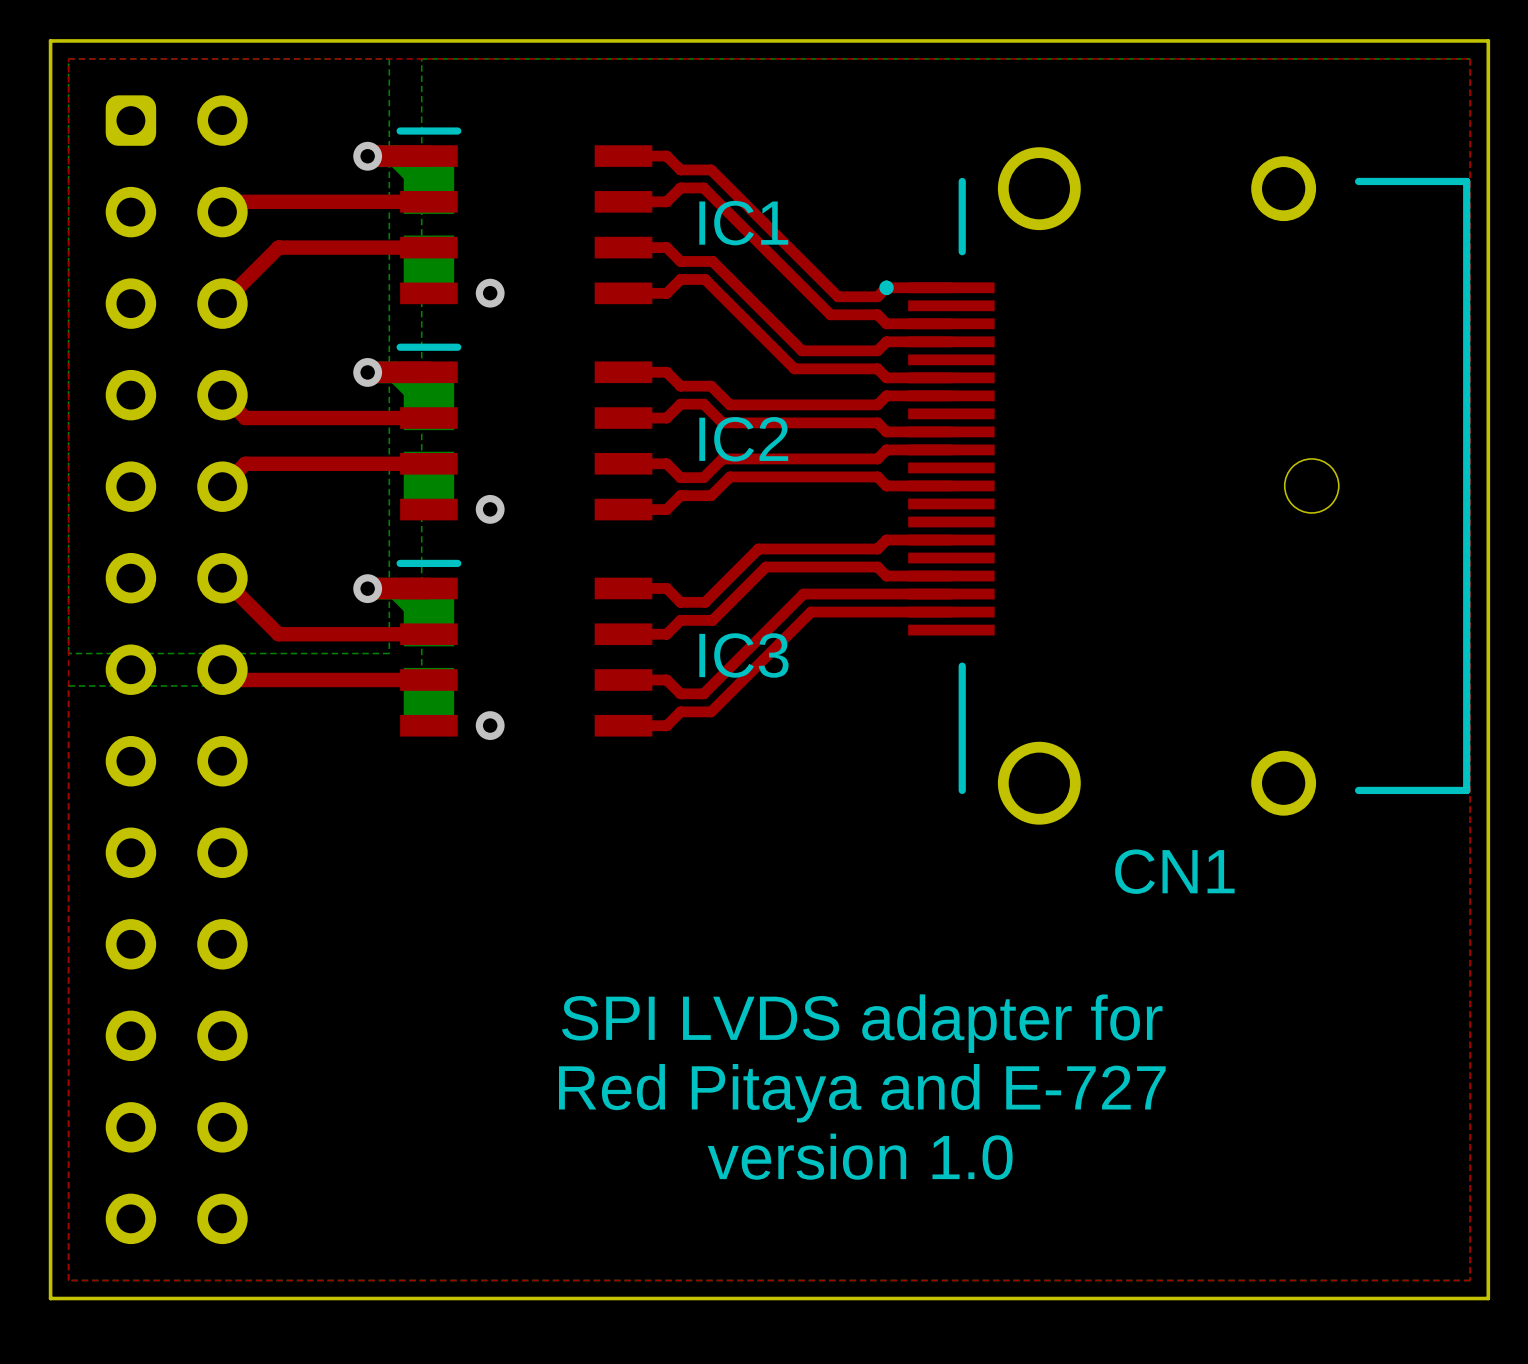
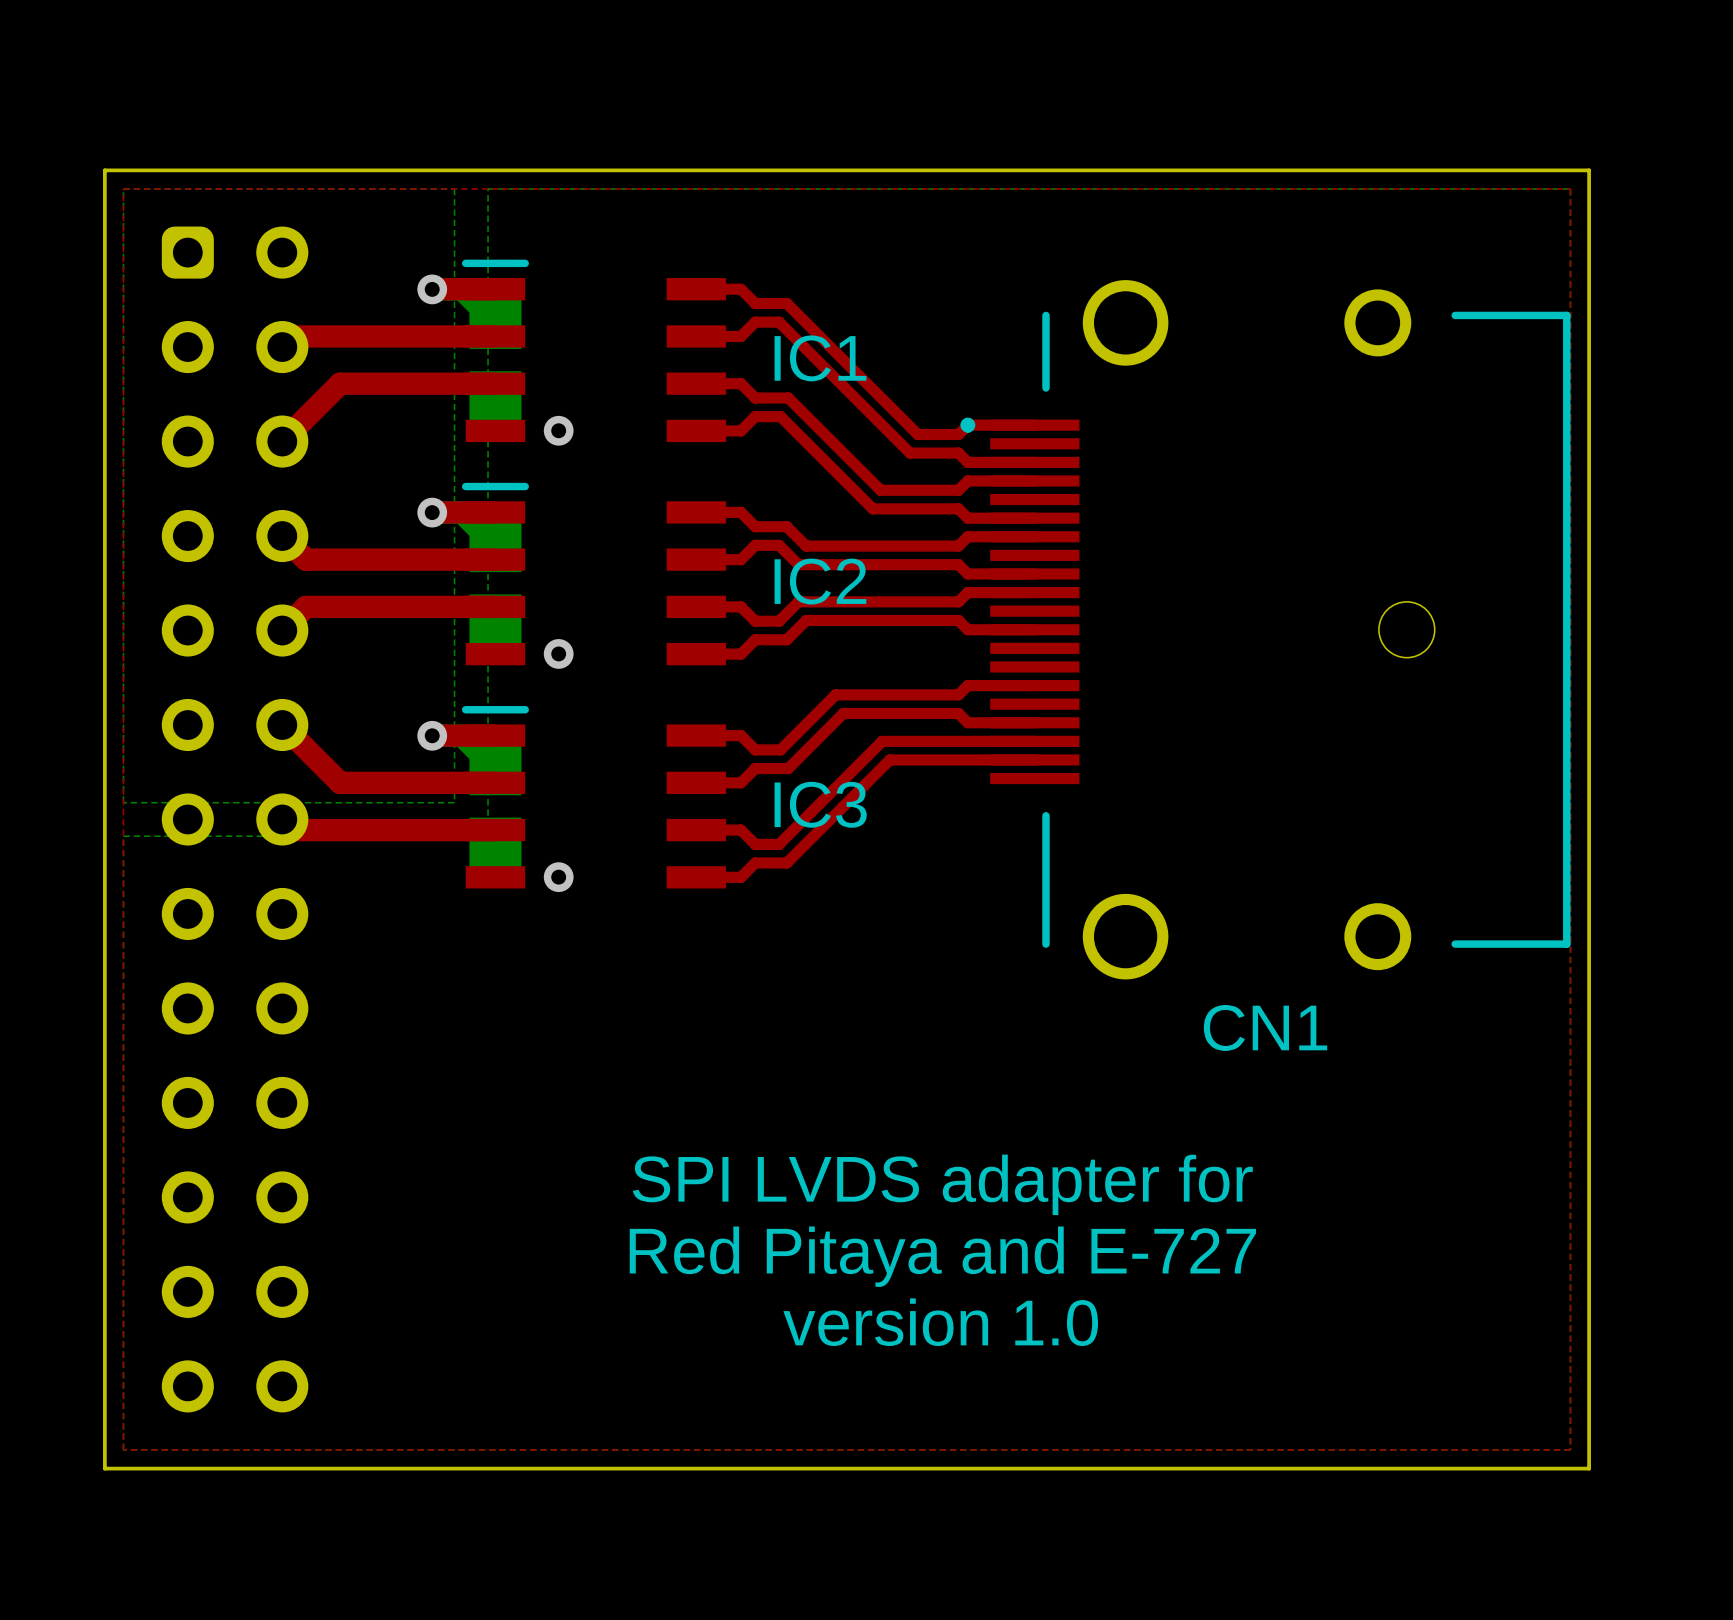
top track width: thin (428, 201) (232, 201) (222, 212) -> thick (495, 336) (292, 336) (282, 347)
top track width: thin (428, 247) (278, 247) (222, 303) -> thick (495, 383) (340, 383) (282, 441)
top track width: thin (222, 395) (245, 418) (428, 418) -> thick (282, 536) (305, 559) (495, 559)
top track width: thin (428, 463) (245, 463) (222, 486) -> thick (495, 606) (305, 606) (282, 630)
top track width: thin (222, 578) (278, 634) (428, 634) -> thick (282, 725) (340, 782) (495, 782)
top track width: thin (222, 669) (232, 679) (428, 679) -> thick (282, 819) (292, 830) (495, 830)

